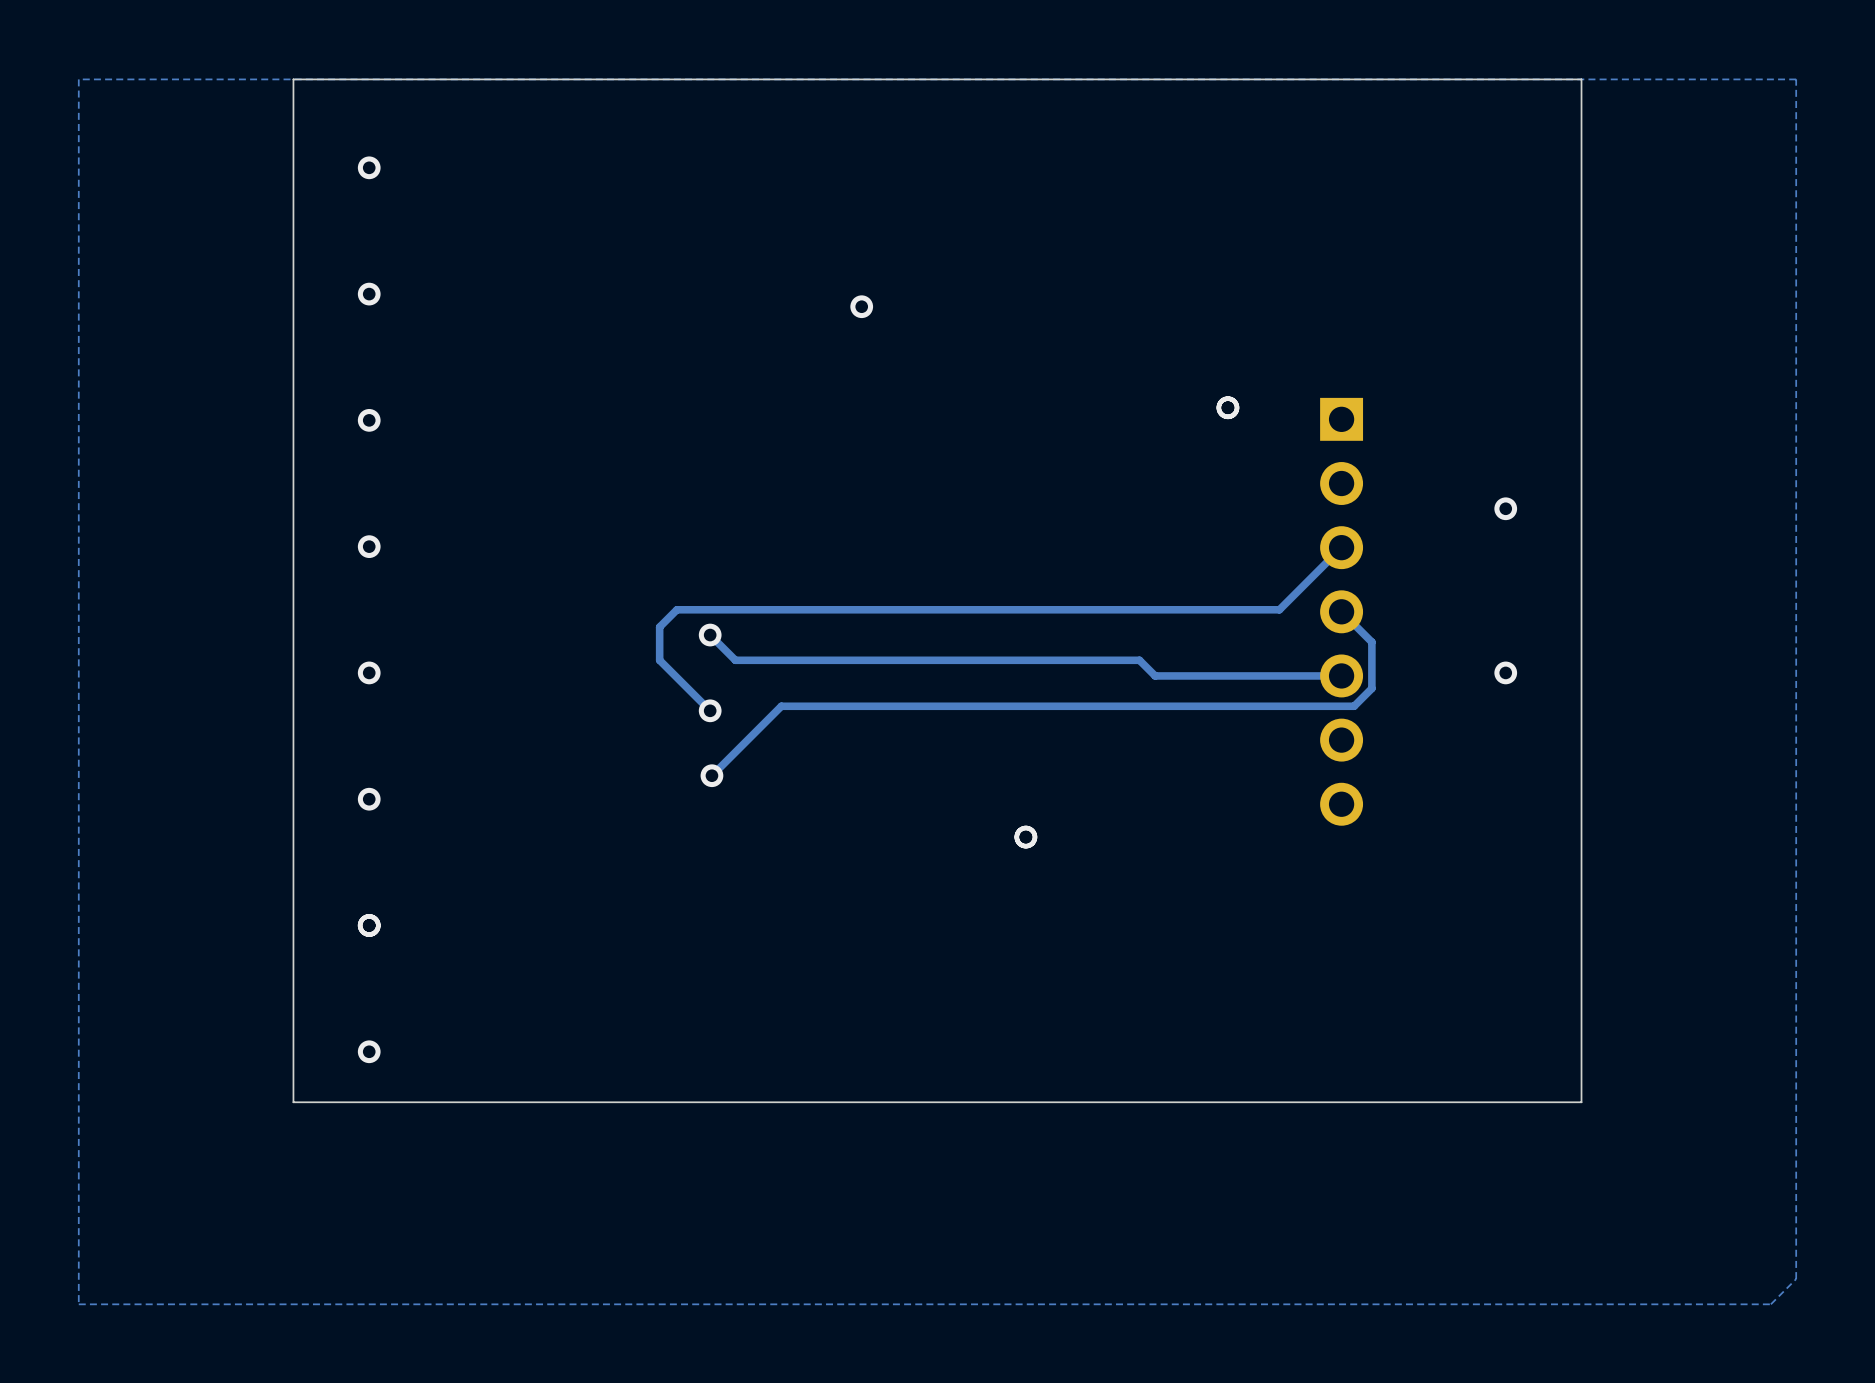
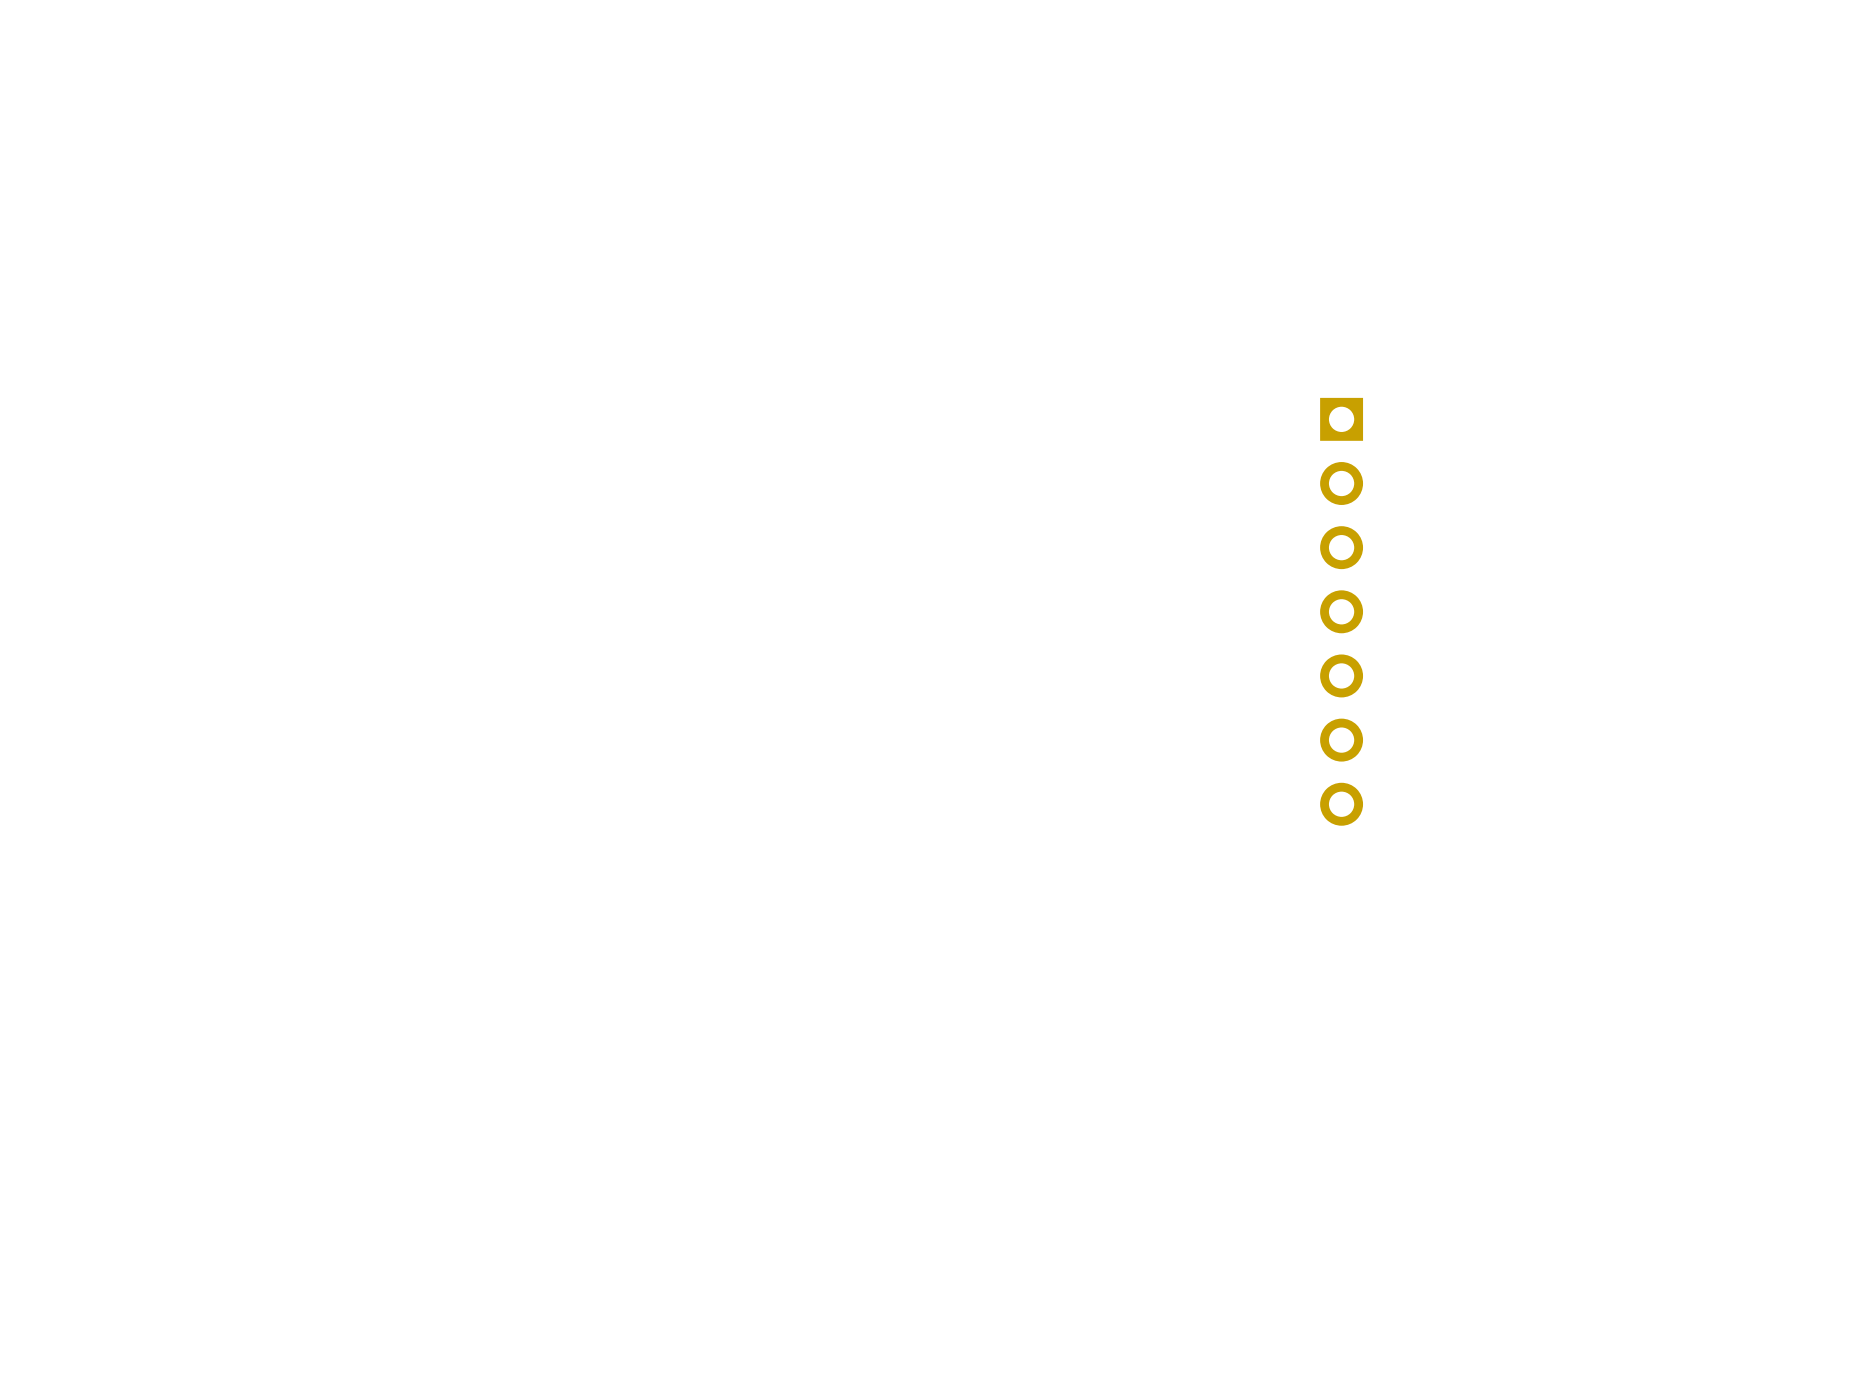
board edge: (1581, 79) (293, 79) (293, 1102) (1581, 1102) (1581, 79) -> none
zone outline: (1796, 79) (1796, 1279) (1770, 1304) (78, 1304) (78, 79) (1796, 79) -> none
via: (369, 167) -> none
via: (369, 294) -> none
via: (861, 306) -> none
via: (1227, 407) -> none
via: (369, 420) -> none
via: (1505, 508) -> none
via: (369, 546) -> none
track: (1341, 547) (1279, 609) (676, 609) (659, 627) (659, 660) (710, 710) -> none
track: (1341, 611) (1371, 642) (1371, 688) (1354, 706) (781, 706) (711, 775) -> none
track: (710, 635) (735, 660) (1139, 660) (1155, 675) (1341, 675) -> none
via: (710, 635) -> none
via: (369, 672) -> none
via: (1505, 672) -> none
via: (710, 710) -> none
via: (711, 775) -> none
via: (369, 799) -> none
via: (1025, 837) -> none
via: (369, 925) -> none
via: (369, 1051) -> none

